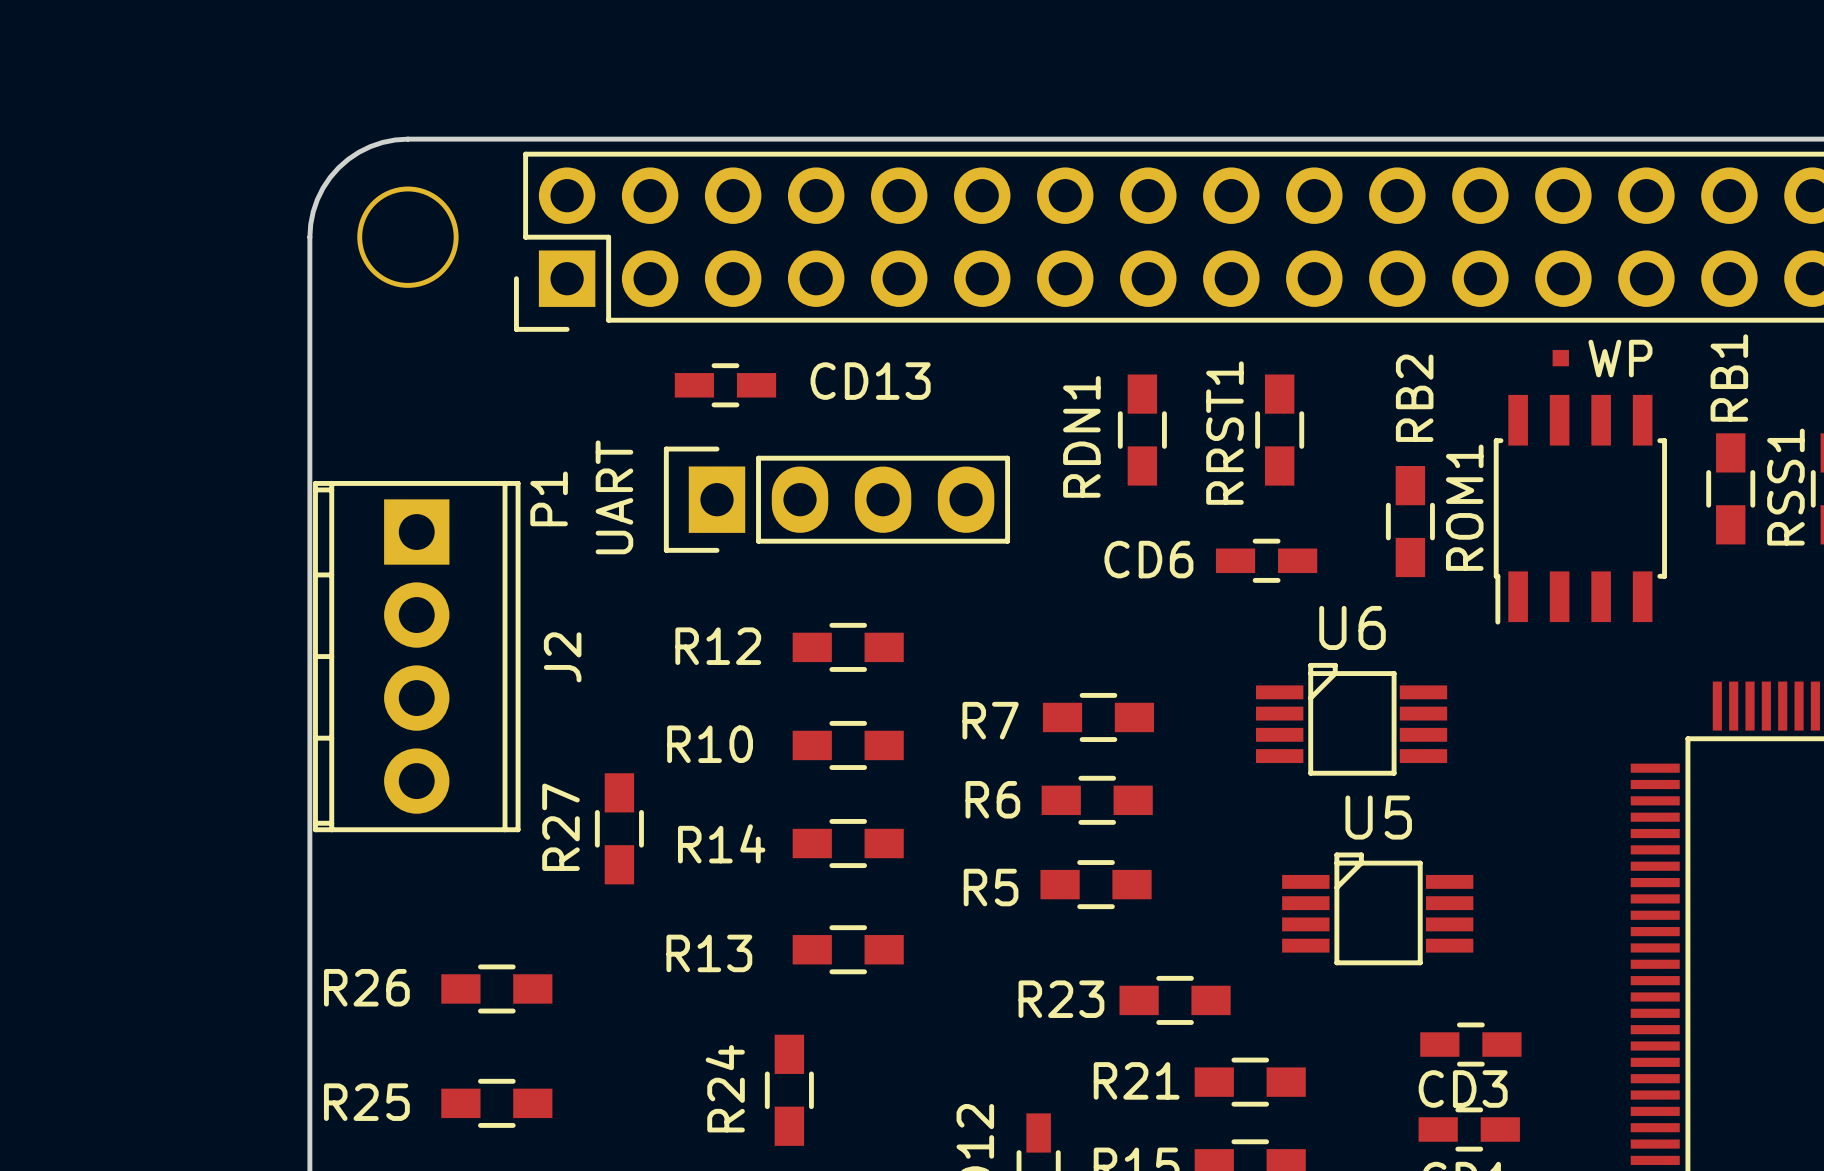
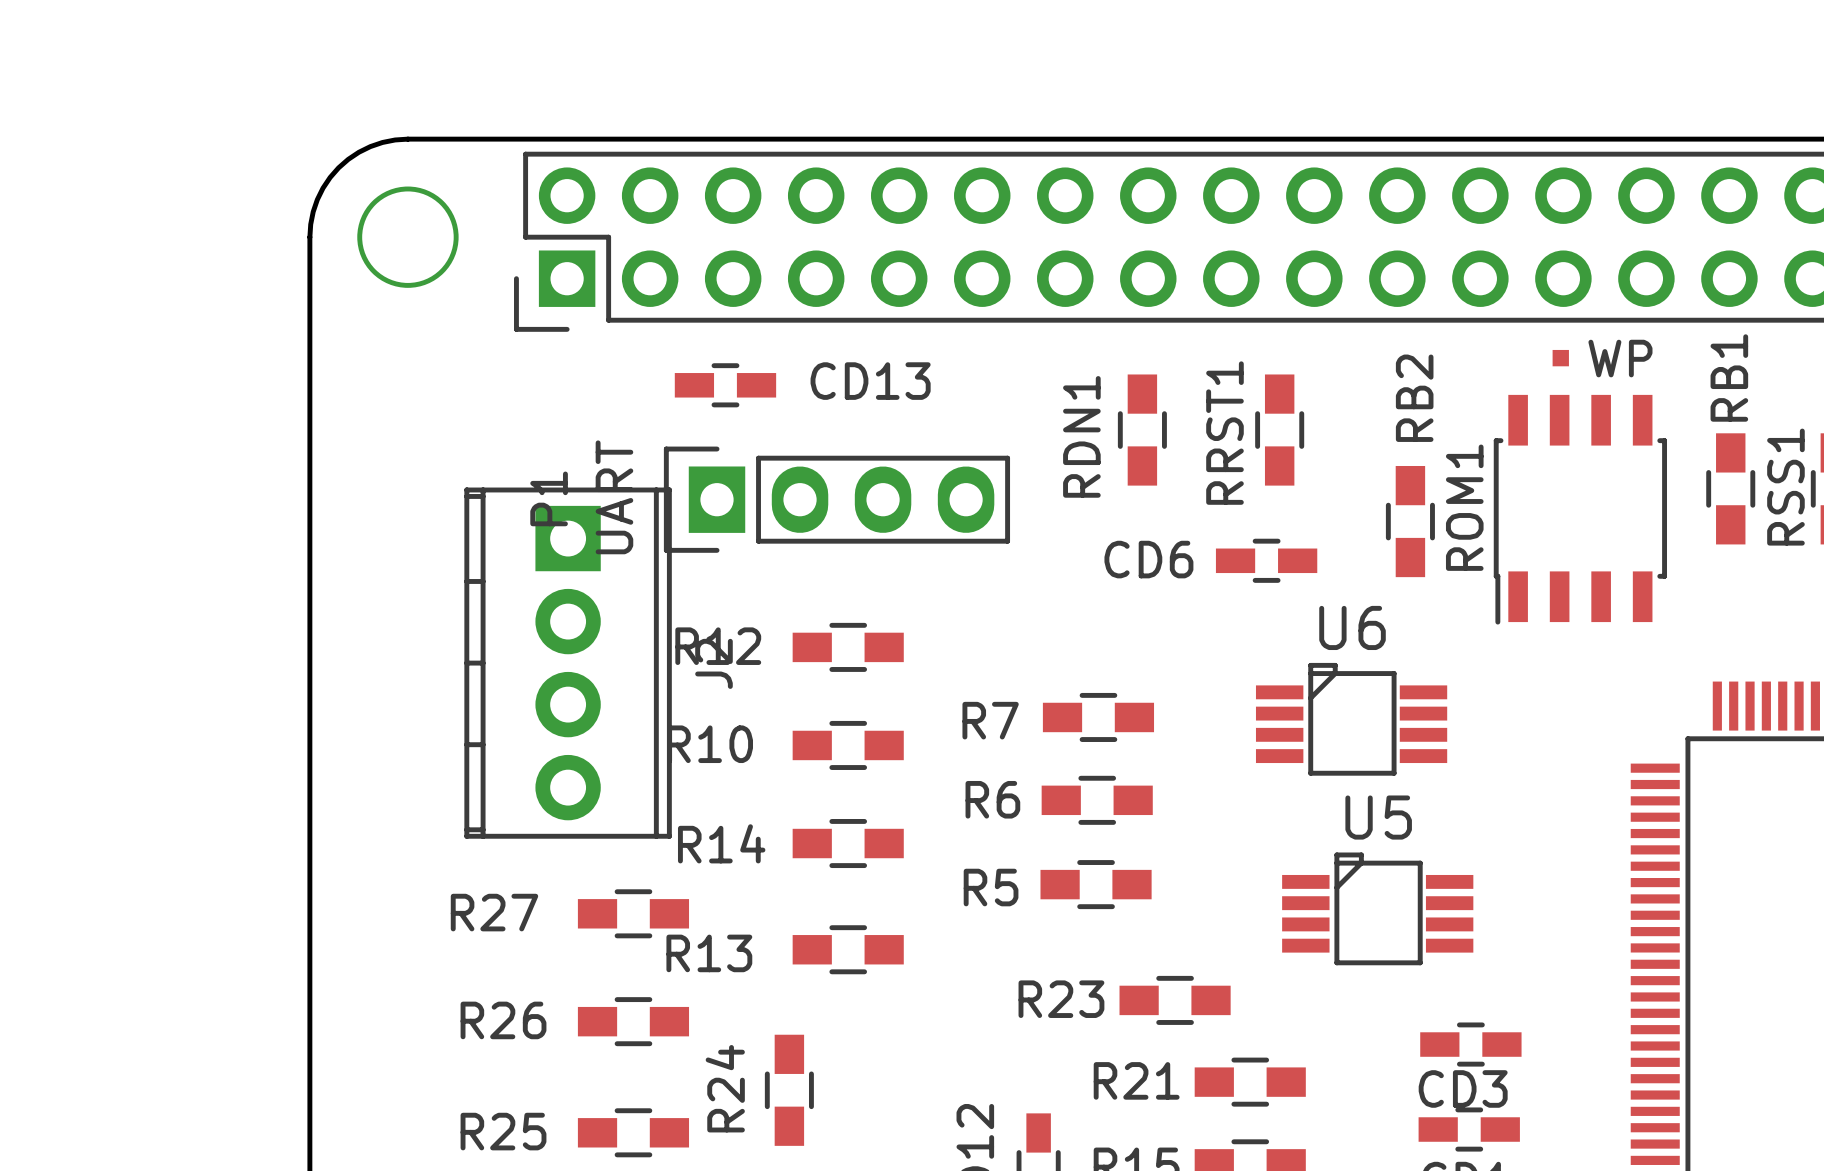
J2 position: (416, 656) -> (568, 663)
R27 name position: R27 (560, 827) -> R27 (494, 912)
R27 rotation: 0° (619, 828) -> 90° clockwise (633, 913)
R27 position: (619, 828) -> (633, 913)
R26 position: (496, 988) -> (633, 1021)
R25 position: (496, 1103) -> (633, 1132)

